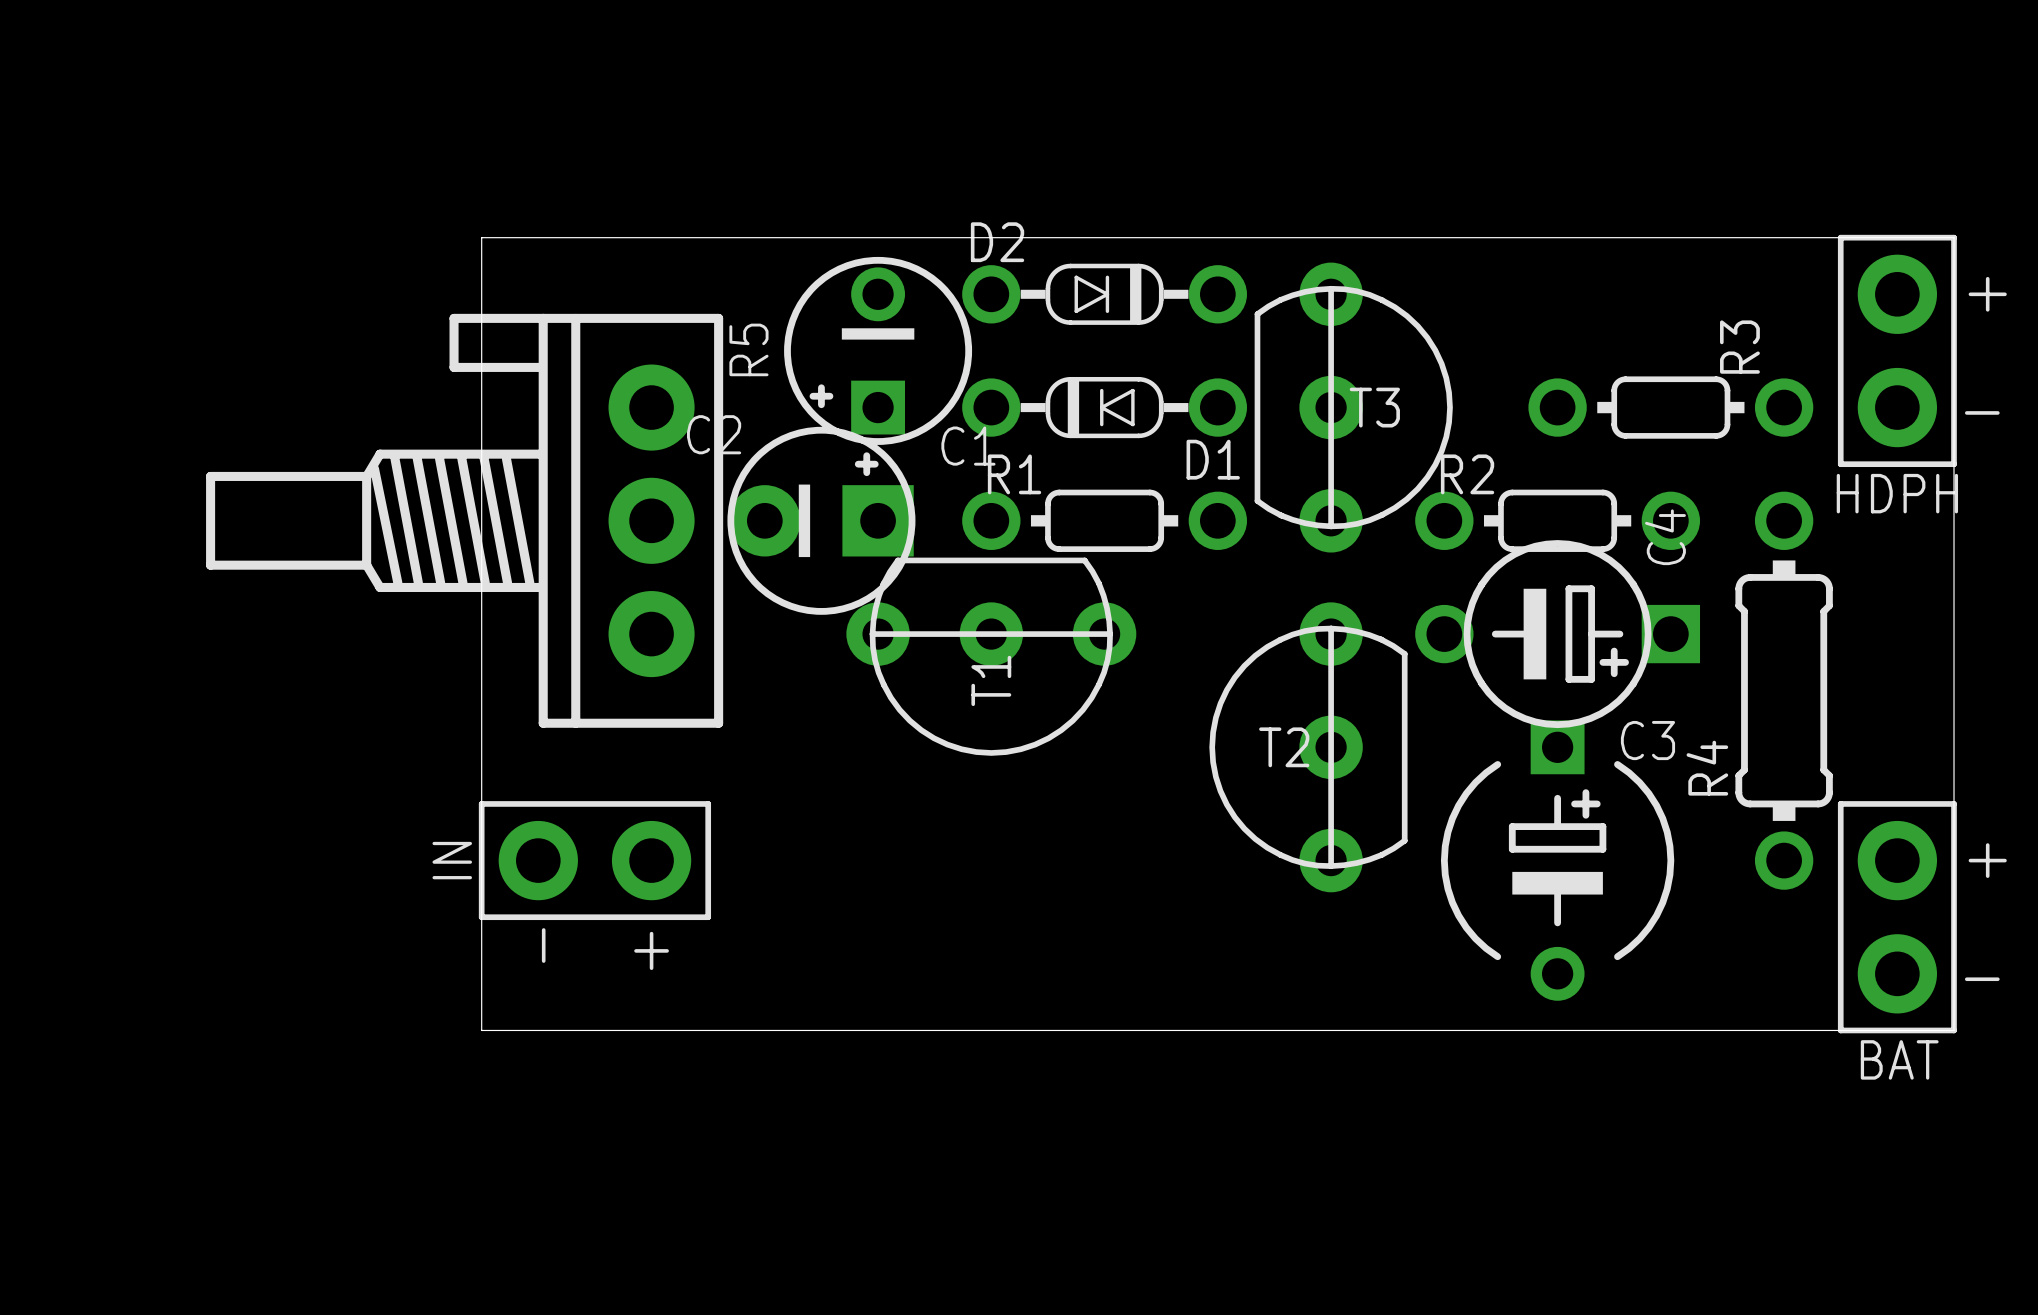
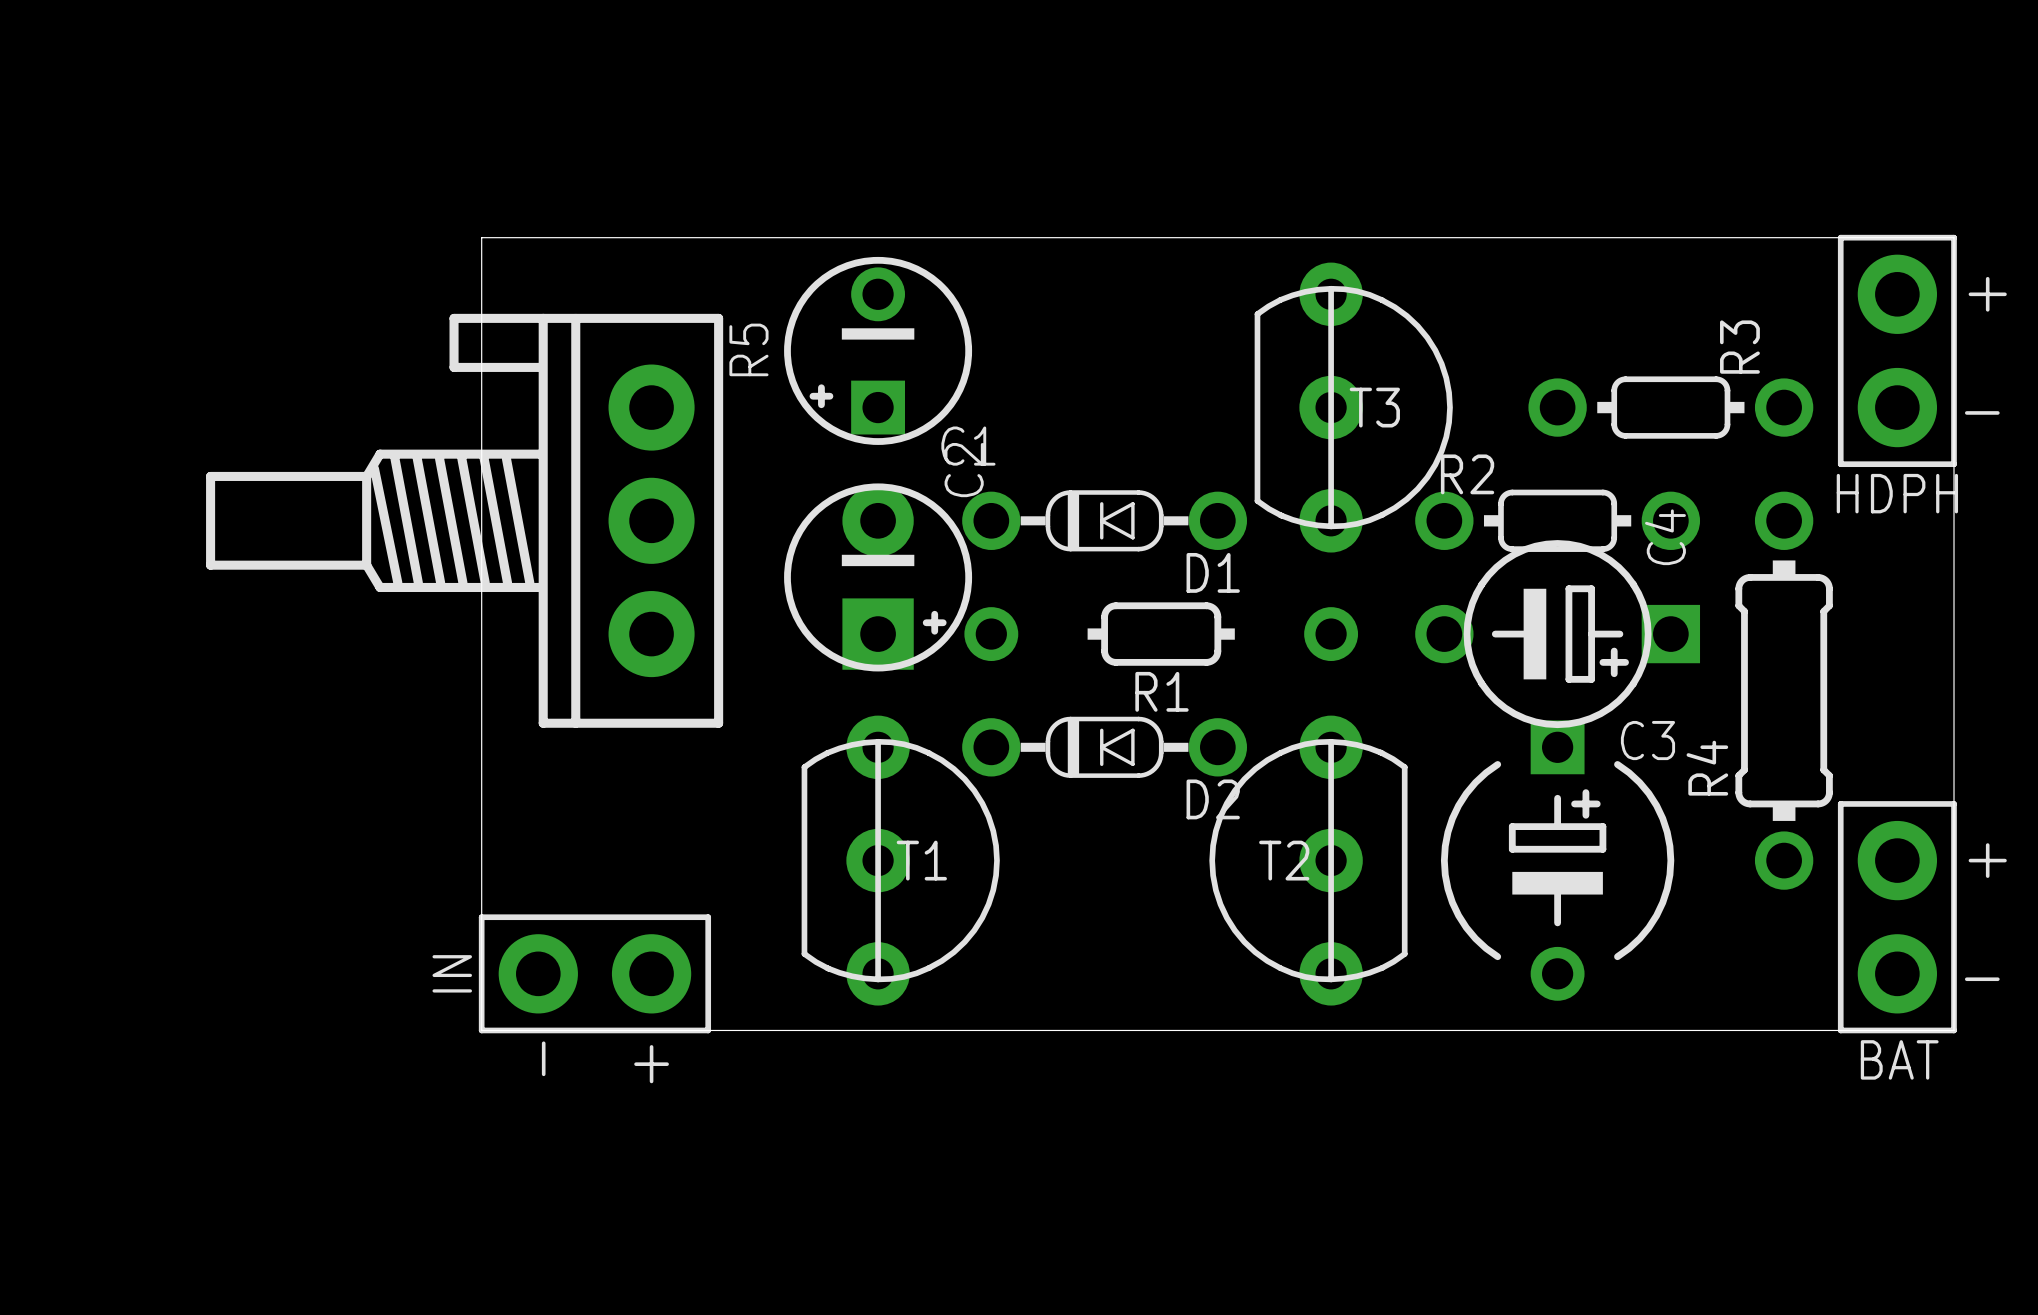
D2 rotation: 0° (1104, 294) -> 180° (1104, 747)
D2 position: (1104, 294) -> (1104, 747)
D1 position: (1104, 407) -> (1104, 520)
R1 name position: R1 (1014, 474) -> R1 (1161, 691)
R1 footprint: [962, 489, 1248, 552] -> [964, 602, 1359, 666]
C2 rotation: 0° (821, 520) -> 90° clockwise (878, 577)
T1 rotation: 0° (991, 656) -> 90° counterclockwise (900, 860)
T1 position: (991, 656) -> (900, 860)
T2 position: (1308, 747) -> (1308, 860)
IN position: (594, 860) -> (594, 973)

